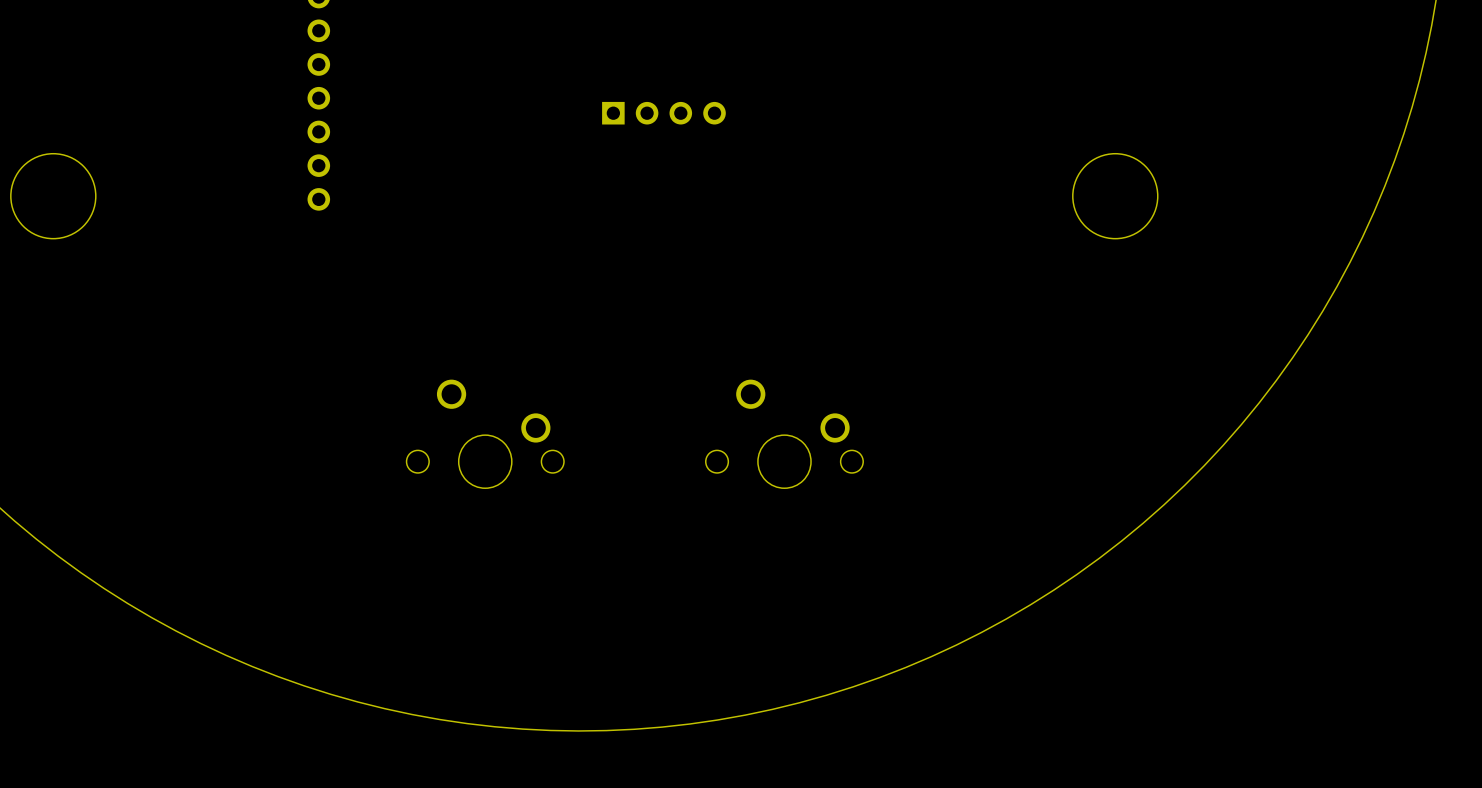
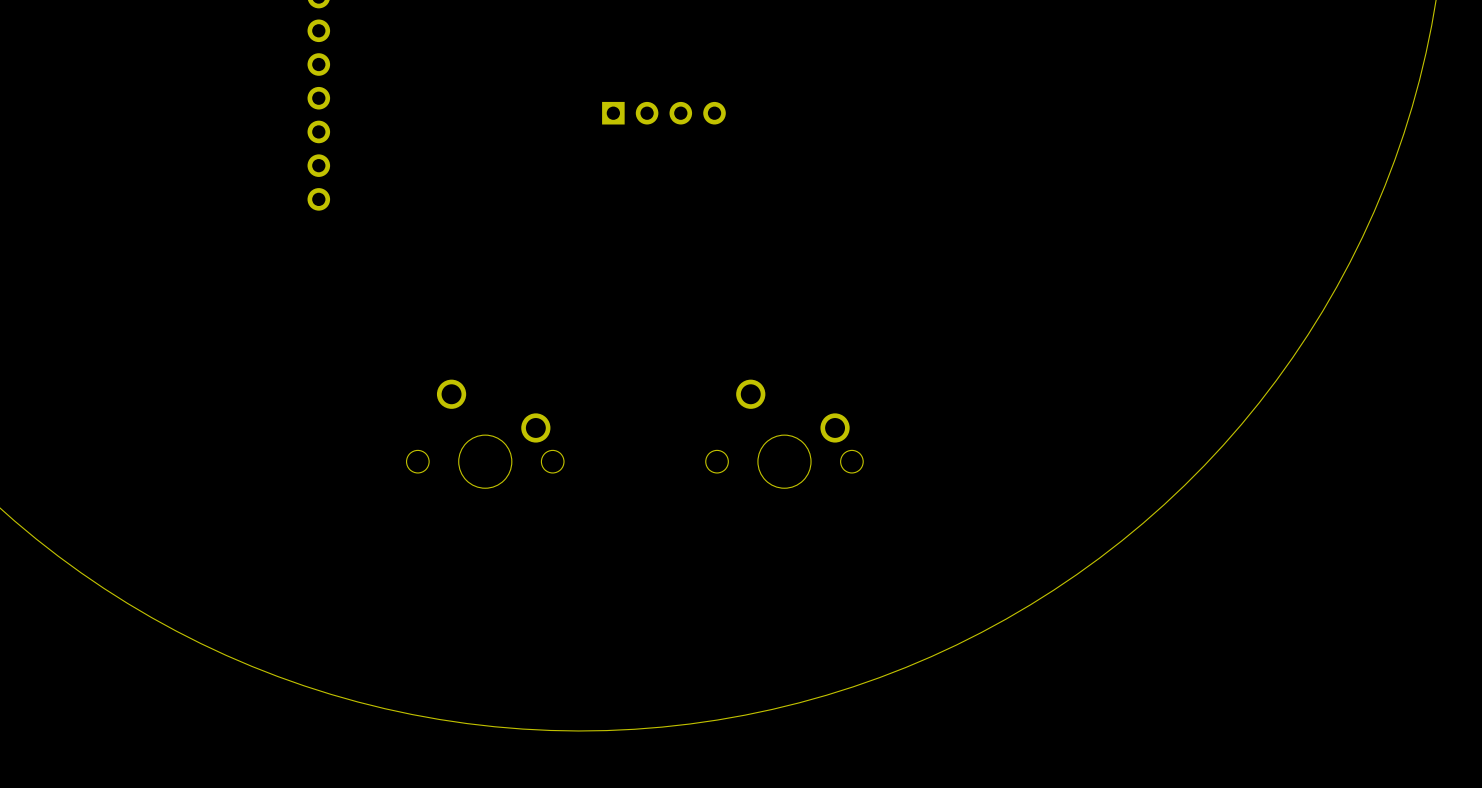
round board edge: [10, 153, 97, 240] -> none
round board edge: [1072, 153, 1159, 240] -> none

